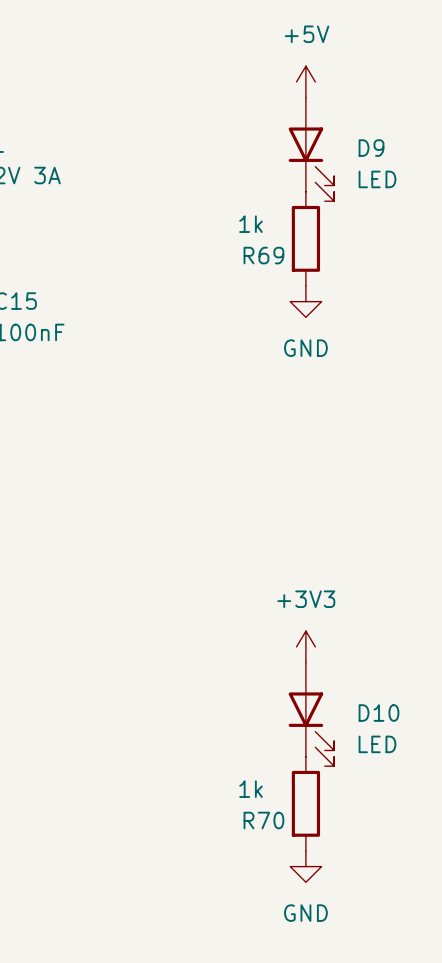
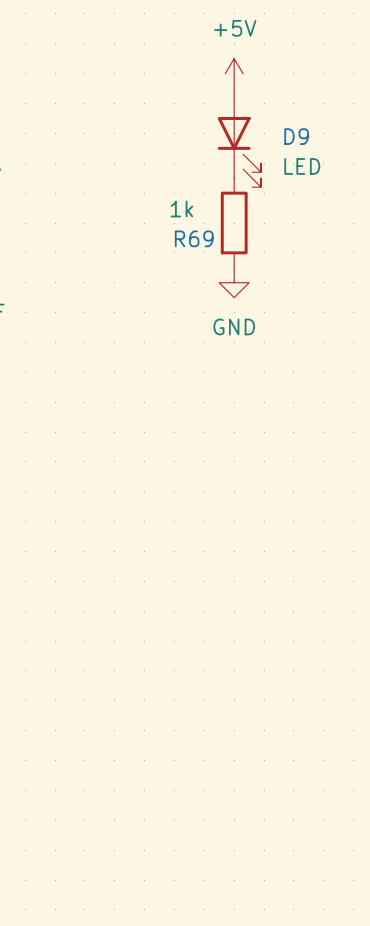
power symbol: +3V3 (305, 646) -> none
D10: LED (311, 714) -> none
R70: 1k (305, 803) -> none
power symbol: GND (305, 866) -> none

